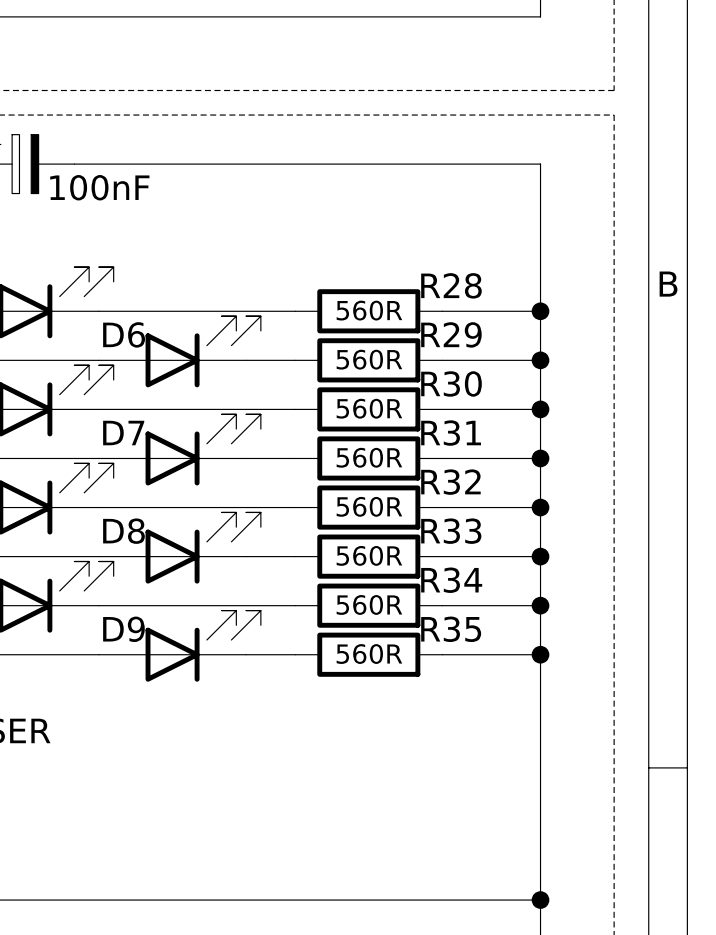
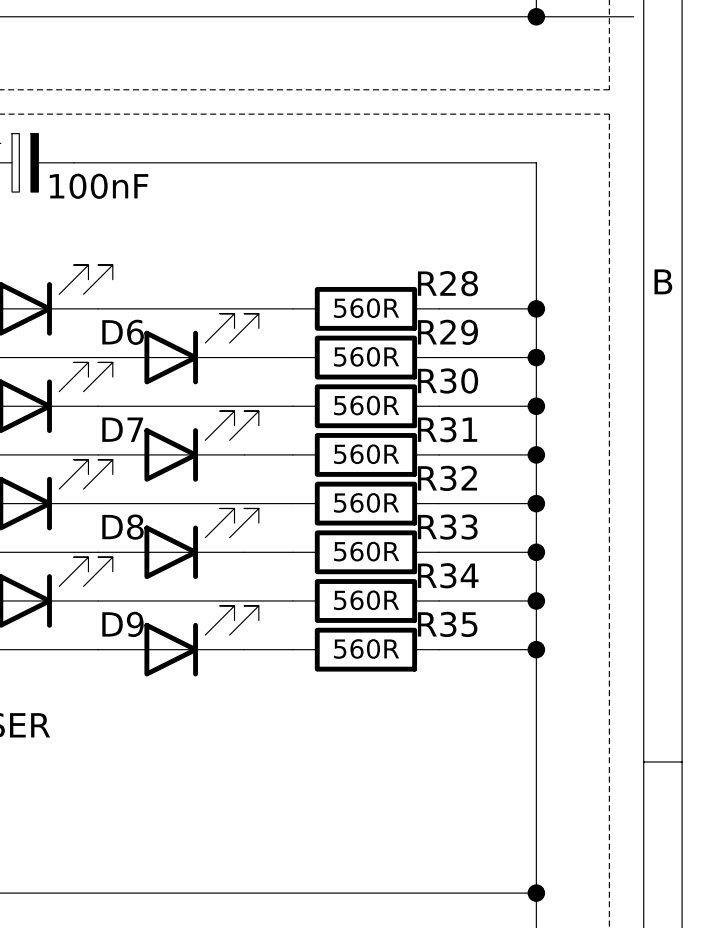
wire: none -> (536, 16) (633, 16)
junction: none -> (536, 16)

